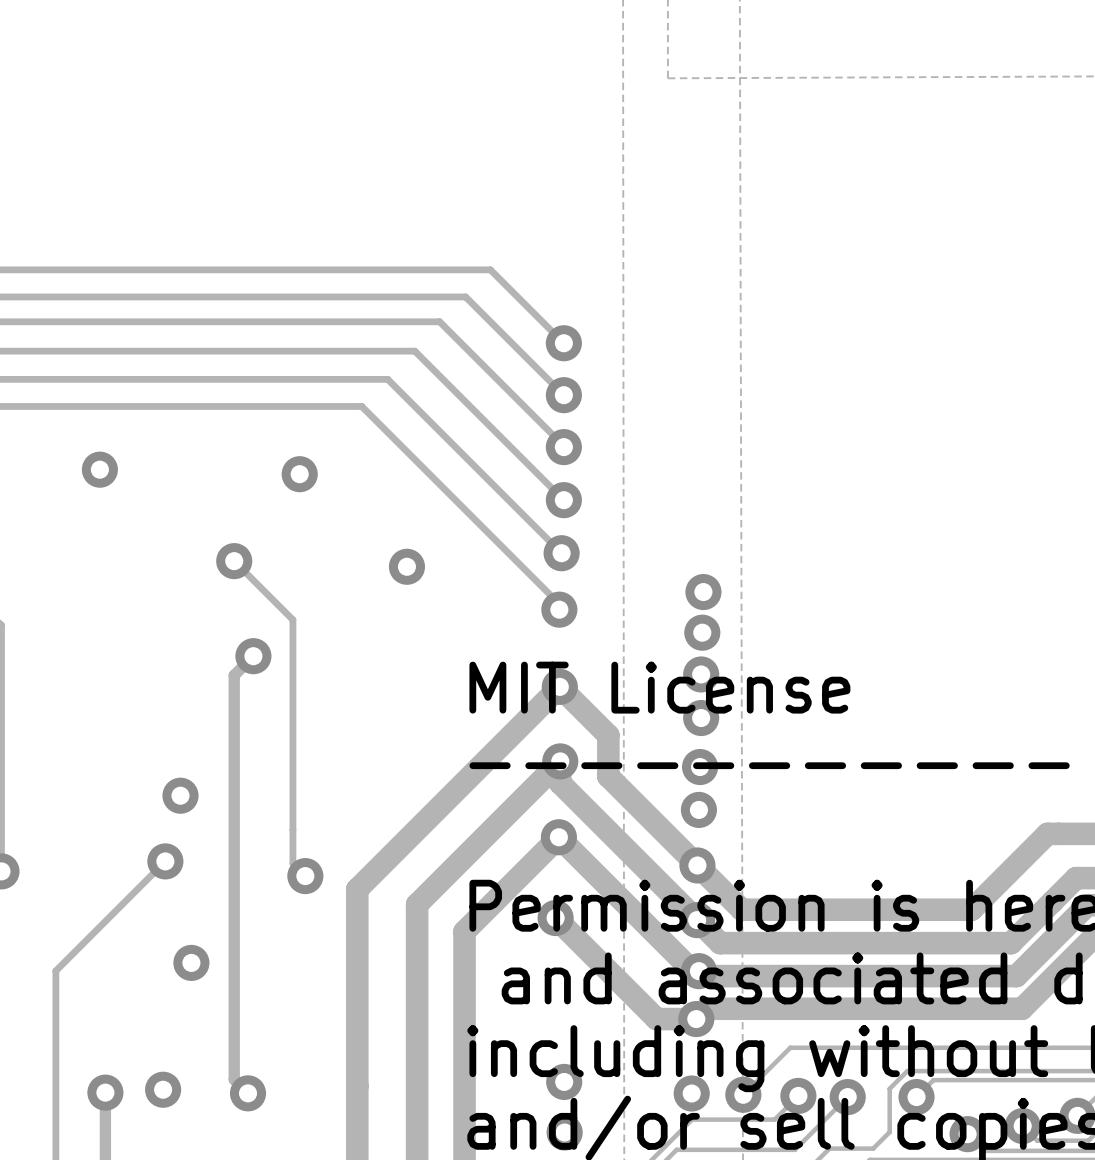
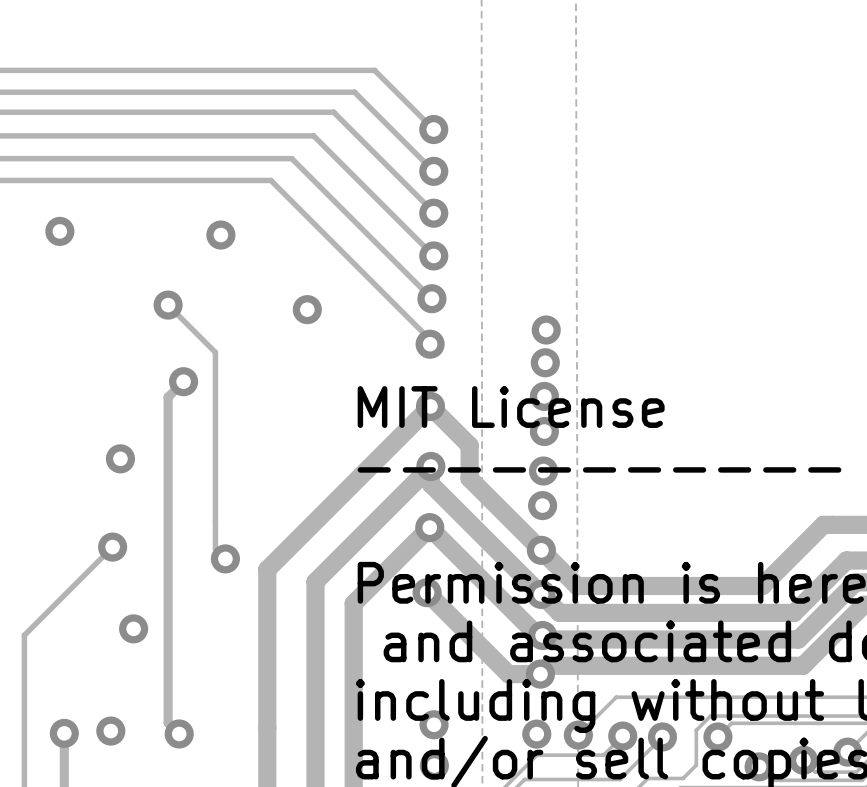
via position: (180, 795) -> (120, 458)

